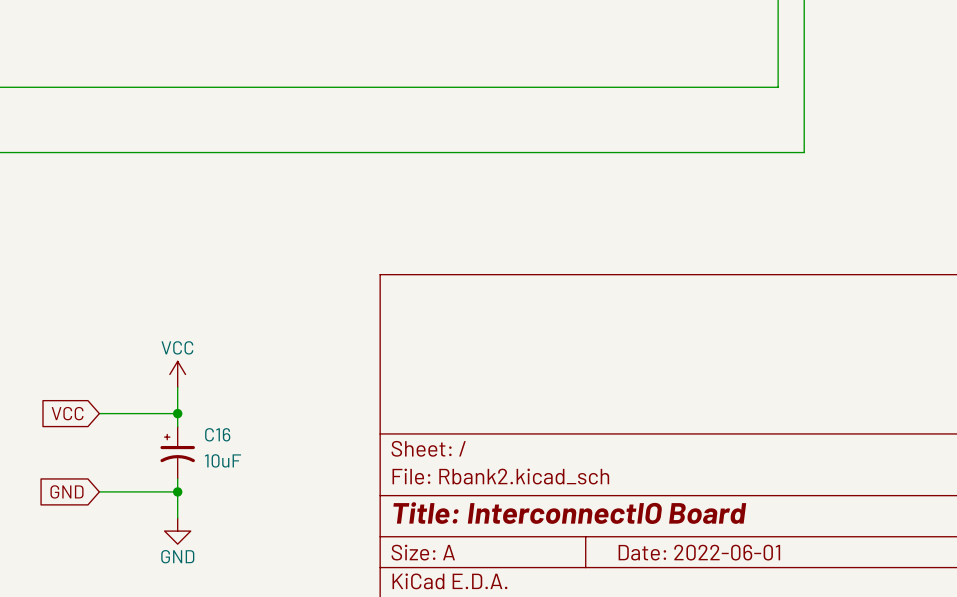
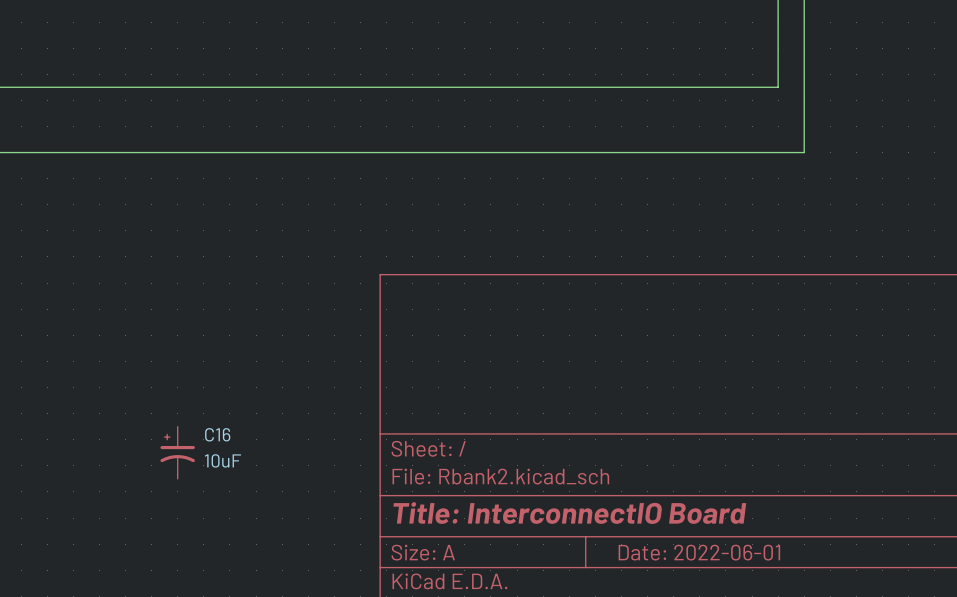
power symbol: VCC (177, 374) -> none
wire: (177, 387) (177, 426) -> none
global label: VCC (67, 413) -> none
wire: (99, 413) (177, 413) -> none
junction: (177, 413) -> none
wire: (177, 478) (177, 518) -> none
global label: GND (66, 491) -> none
wire: (99, 491) (177, 491) -> none
junction: (177, 491) -> none
power symbol: GND (177, 531) -> none

